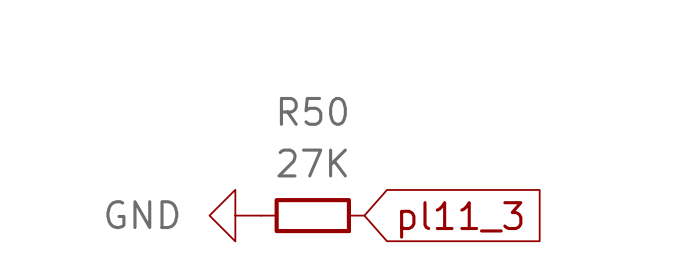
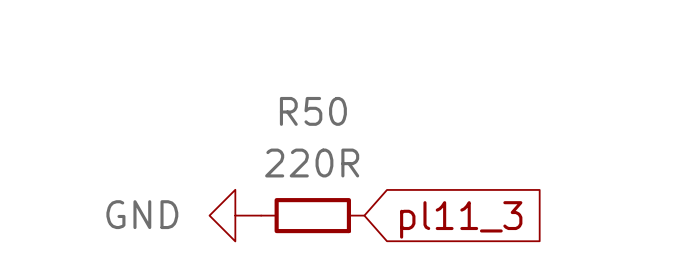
R50 value: 27K (312, 163) -> 220R (312, 163)

